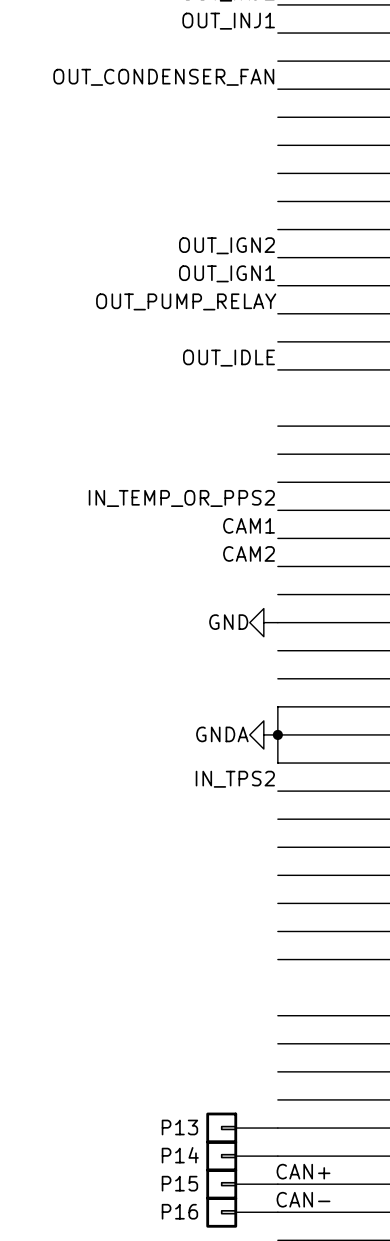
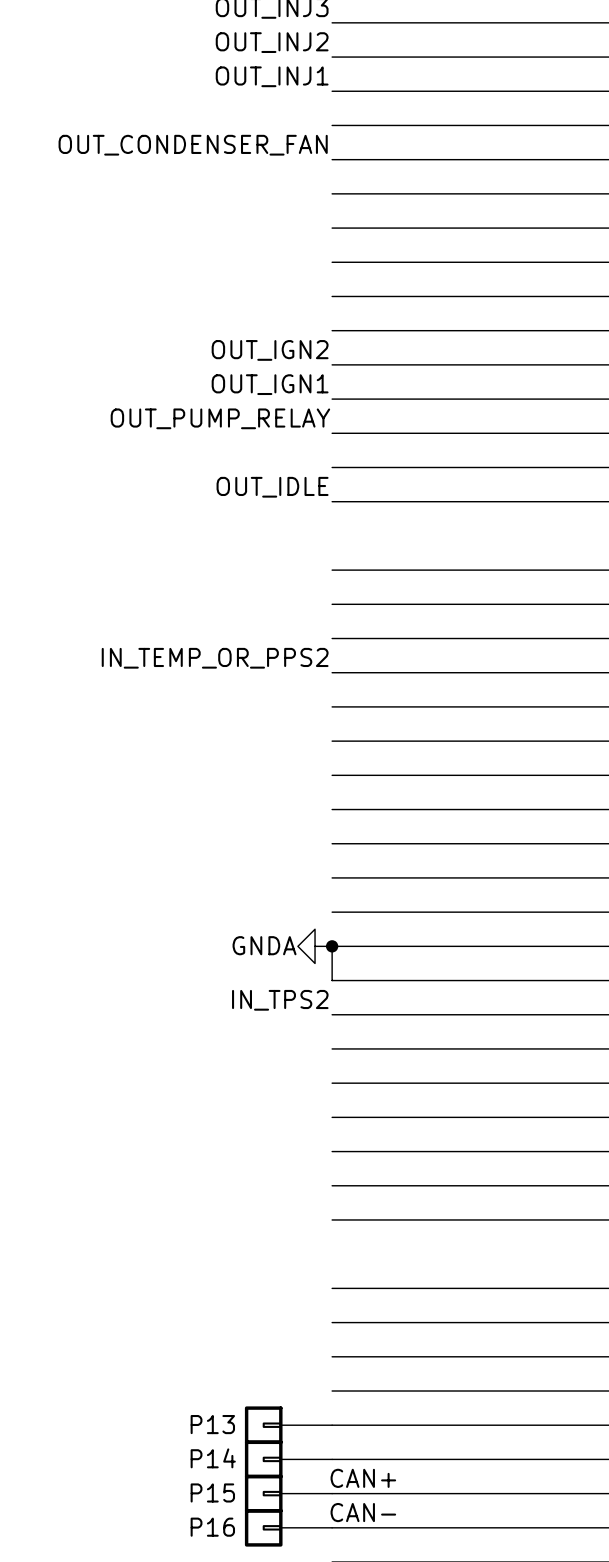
label: CAM1 (249, 525) -> none
label: CAM2 (249, 553) -> none
power symbol: GND (263, 622) -> none
wire: (277, 706) (277, 734) -> none

